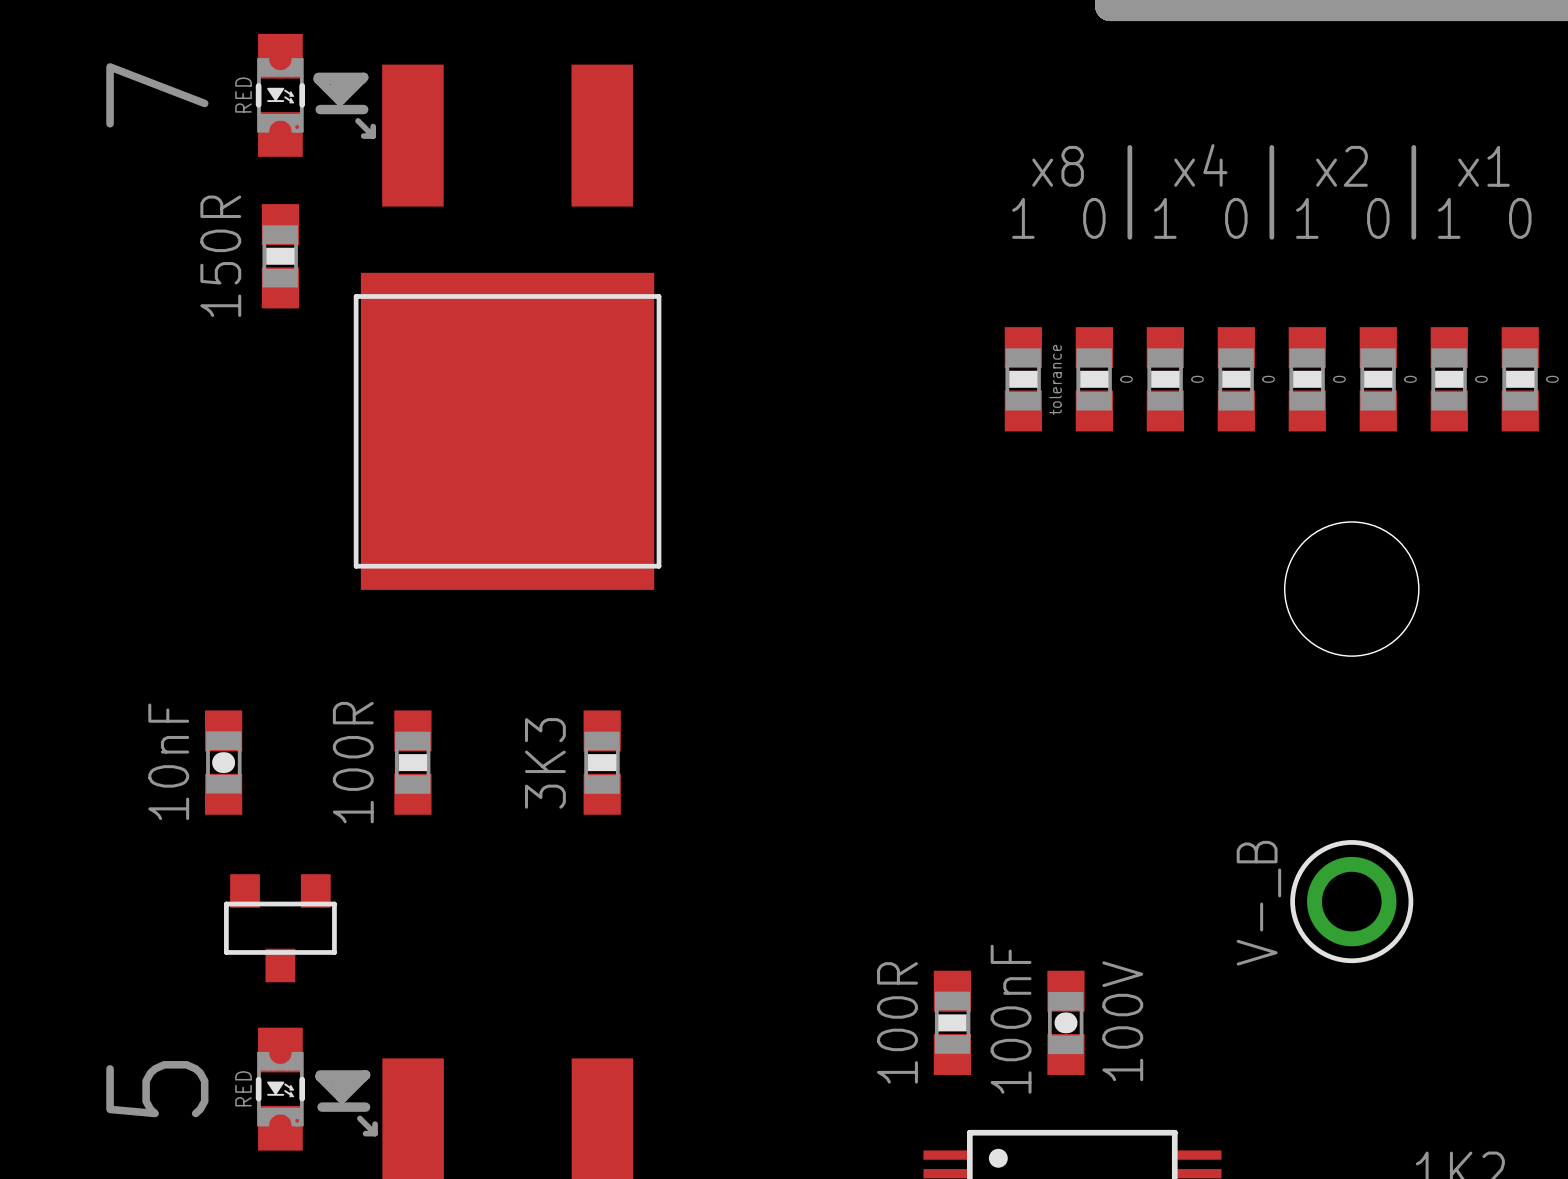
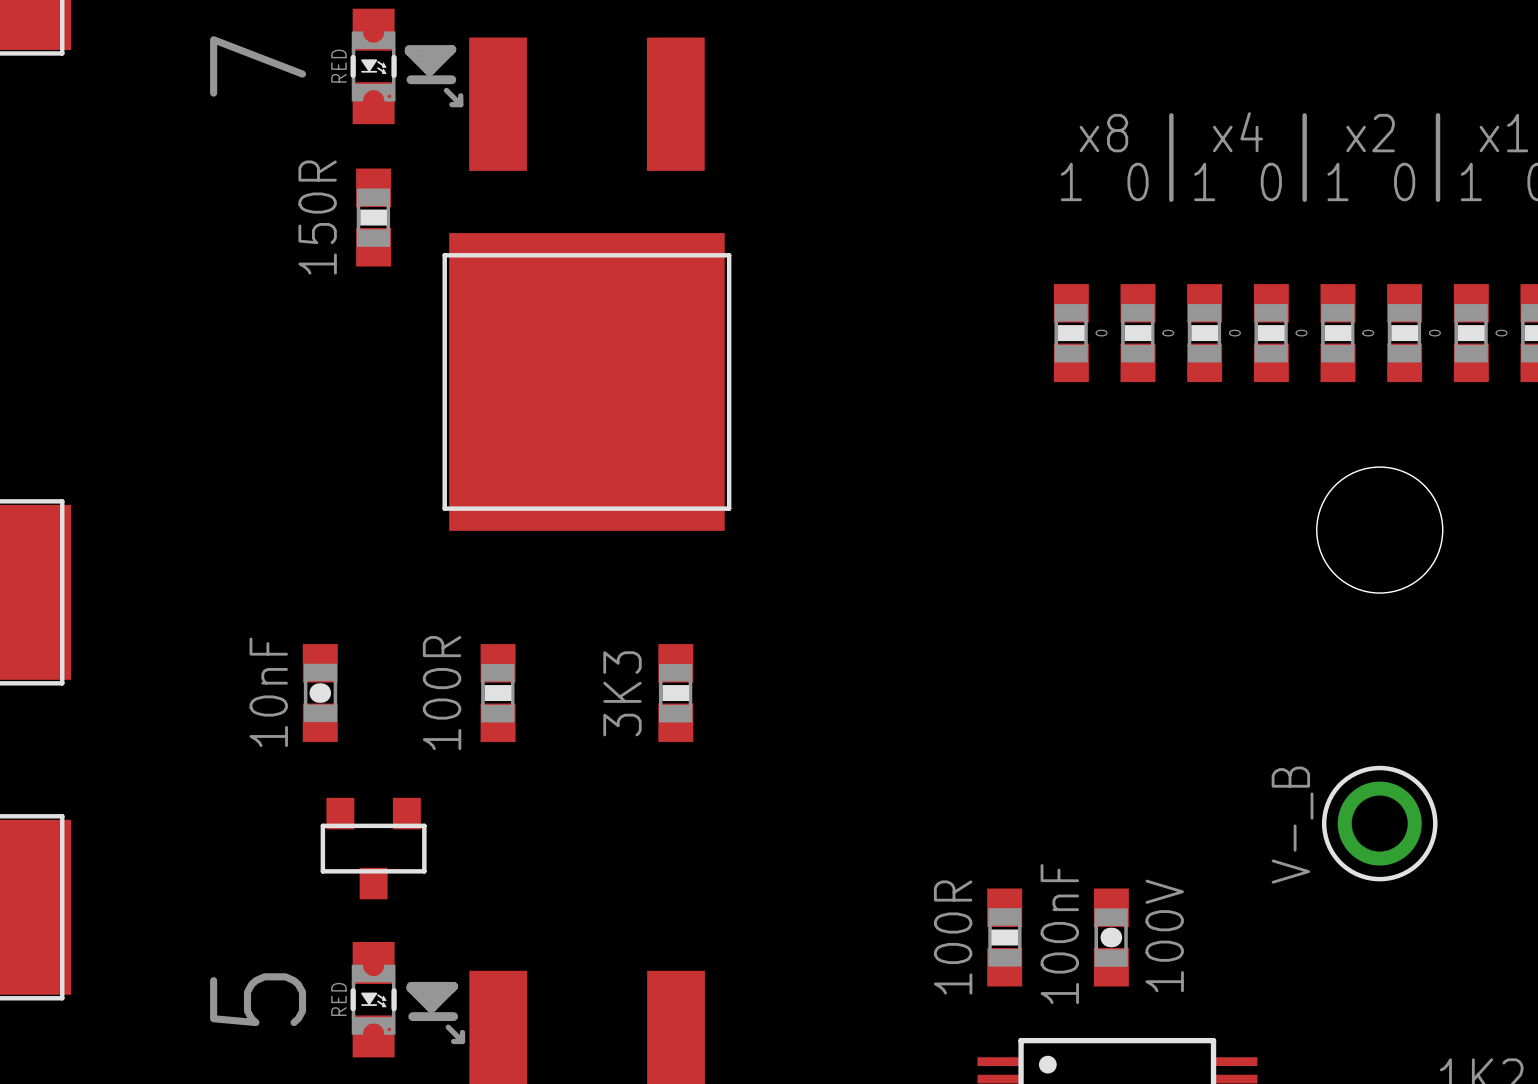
part value: tolerance (1055, 379) -> 0 (1101, 333)

